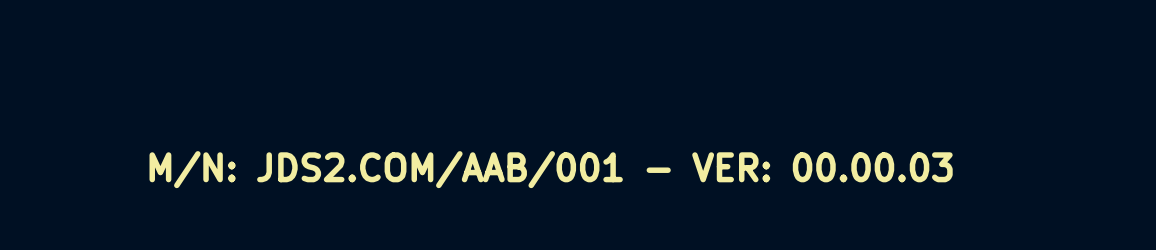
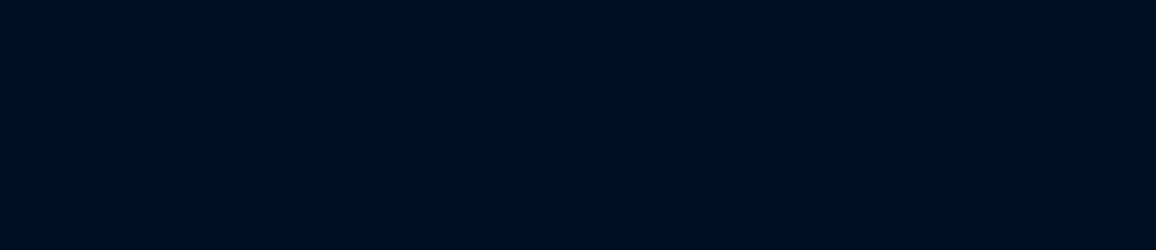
text: M/N: JDS2.COM/AAB/001 - VER: 00.00.03 (551, 169) -> none

